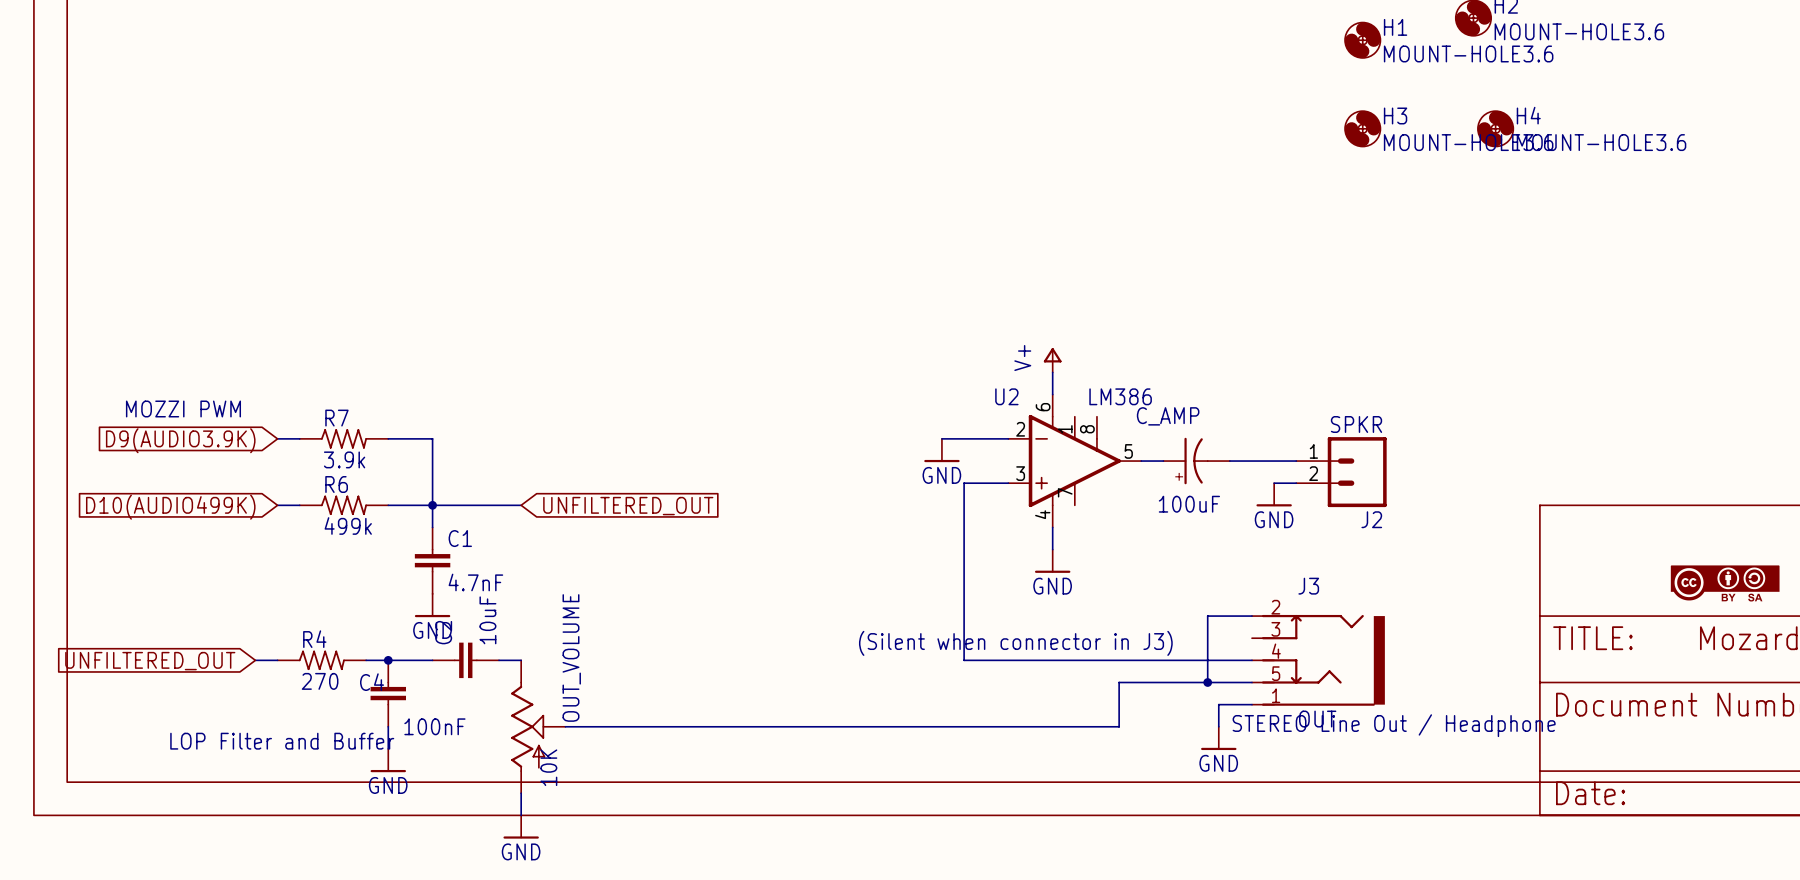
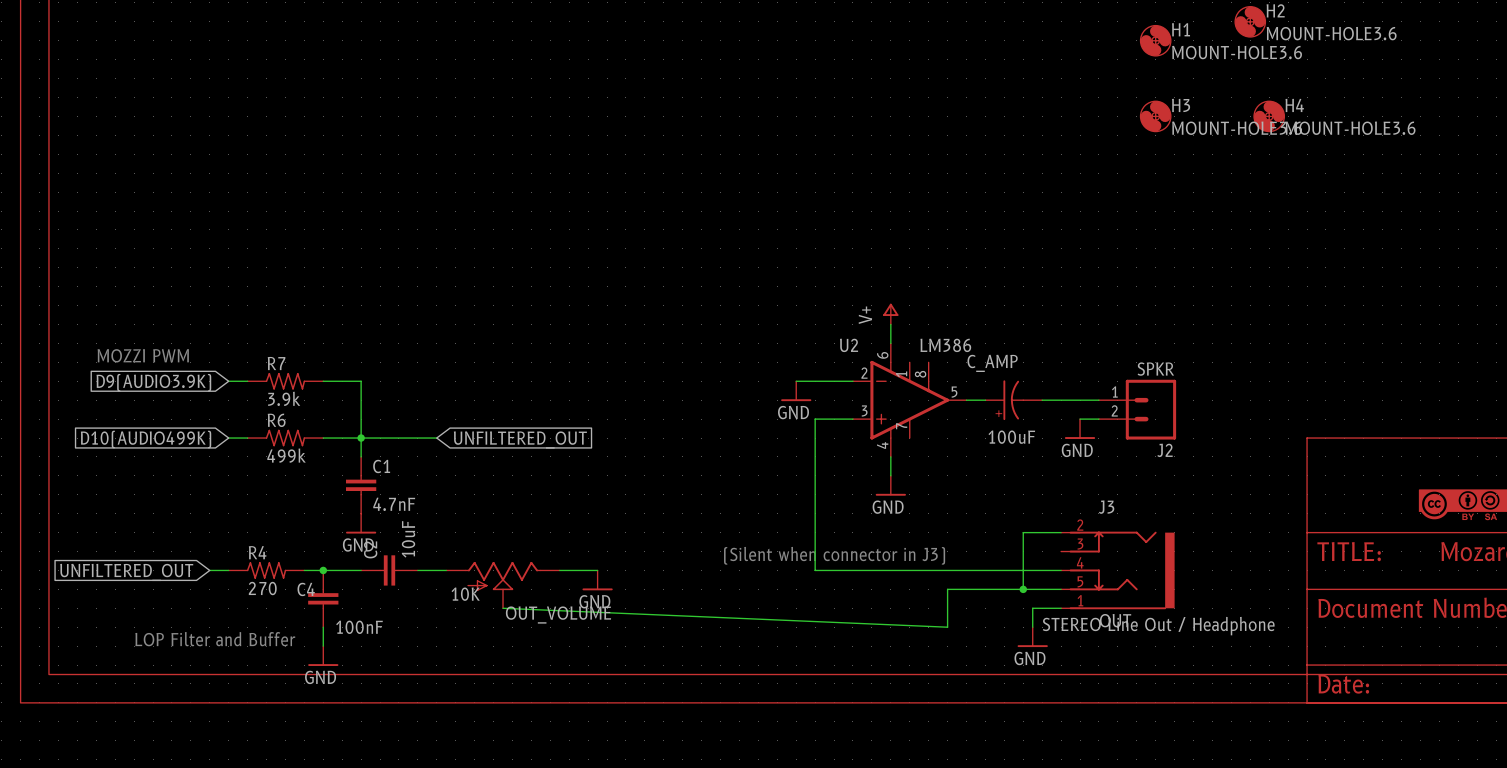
wire: none -> (436, 570) (446, 570)
wire: none -> (559, 570) (597, 570)
power symbol: none -> GND (597, 580)
OUT_VOLUME rotation: 0° (528, 726) -> 90° clockwise (503, 576)
wire: (565, 726) (1119, 726) -> (503, 608) (947, 627)
wire: (521, 793) (521, 815) -> none
power symbol: GND (521, 827) -> none

